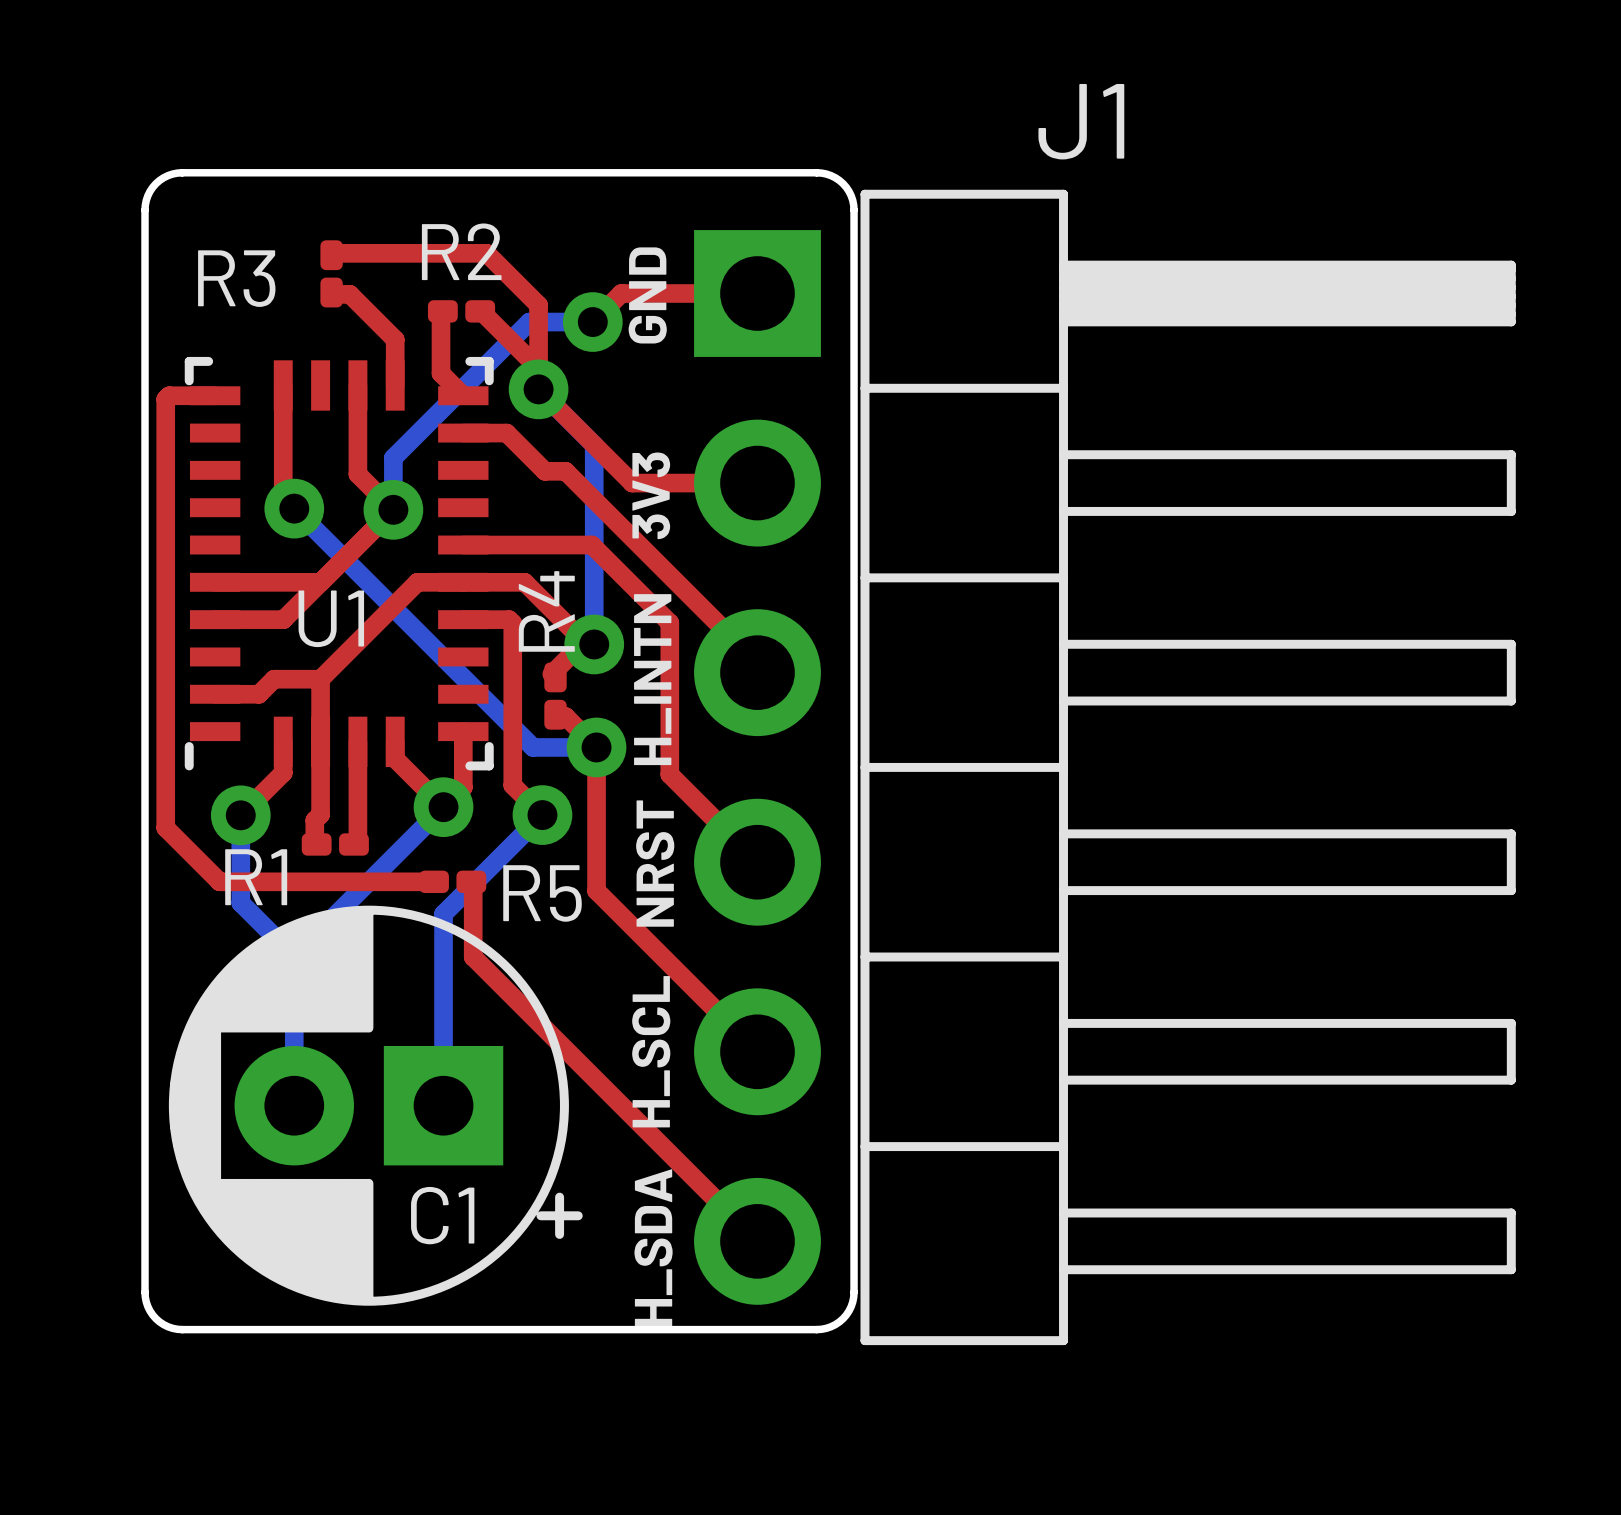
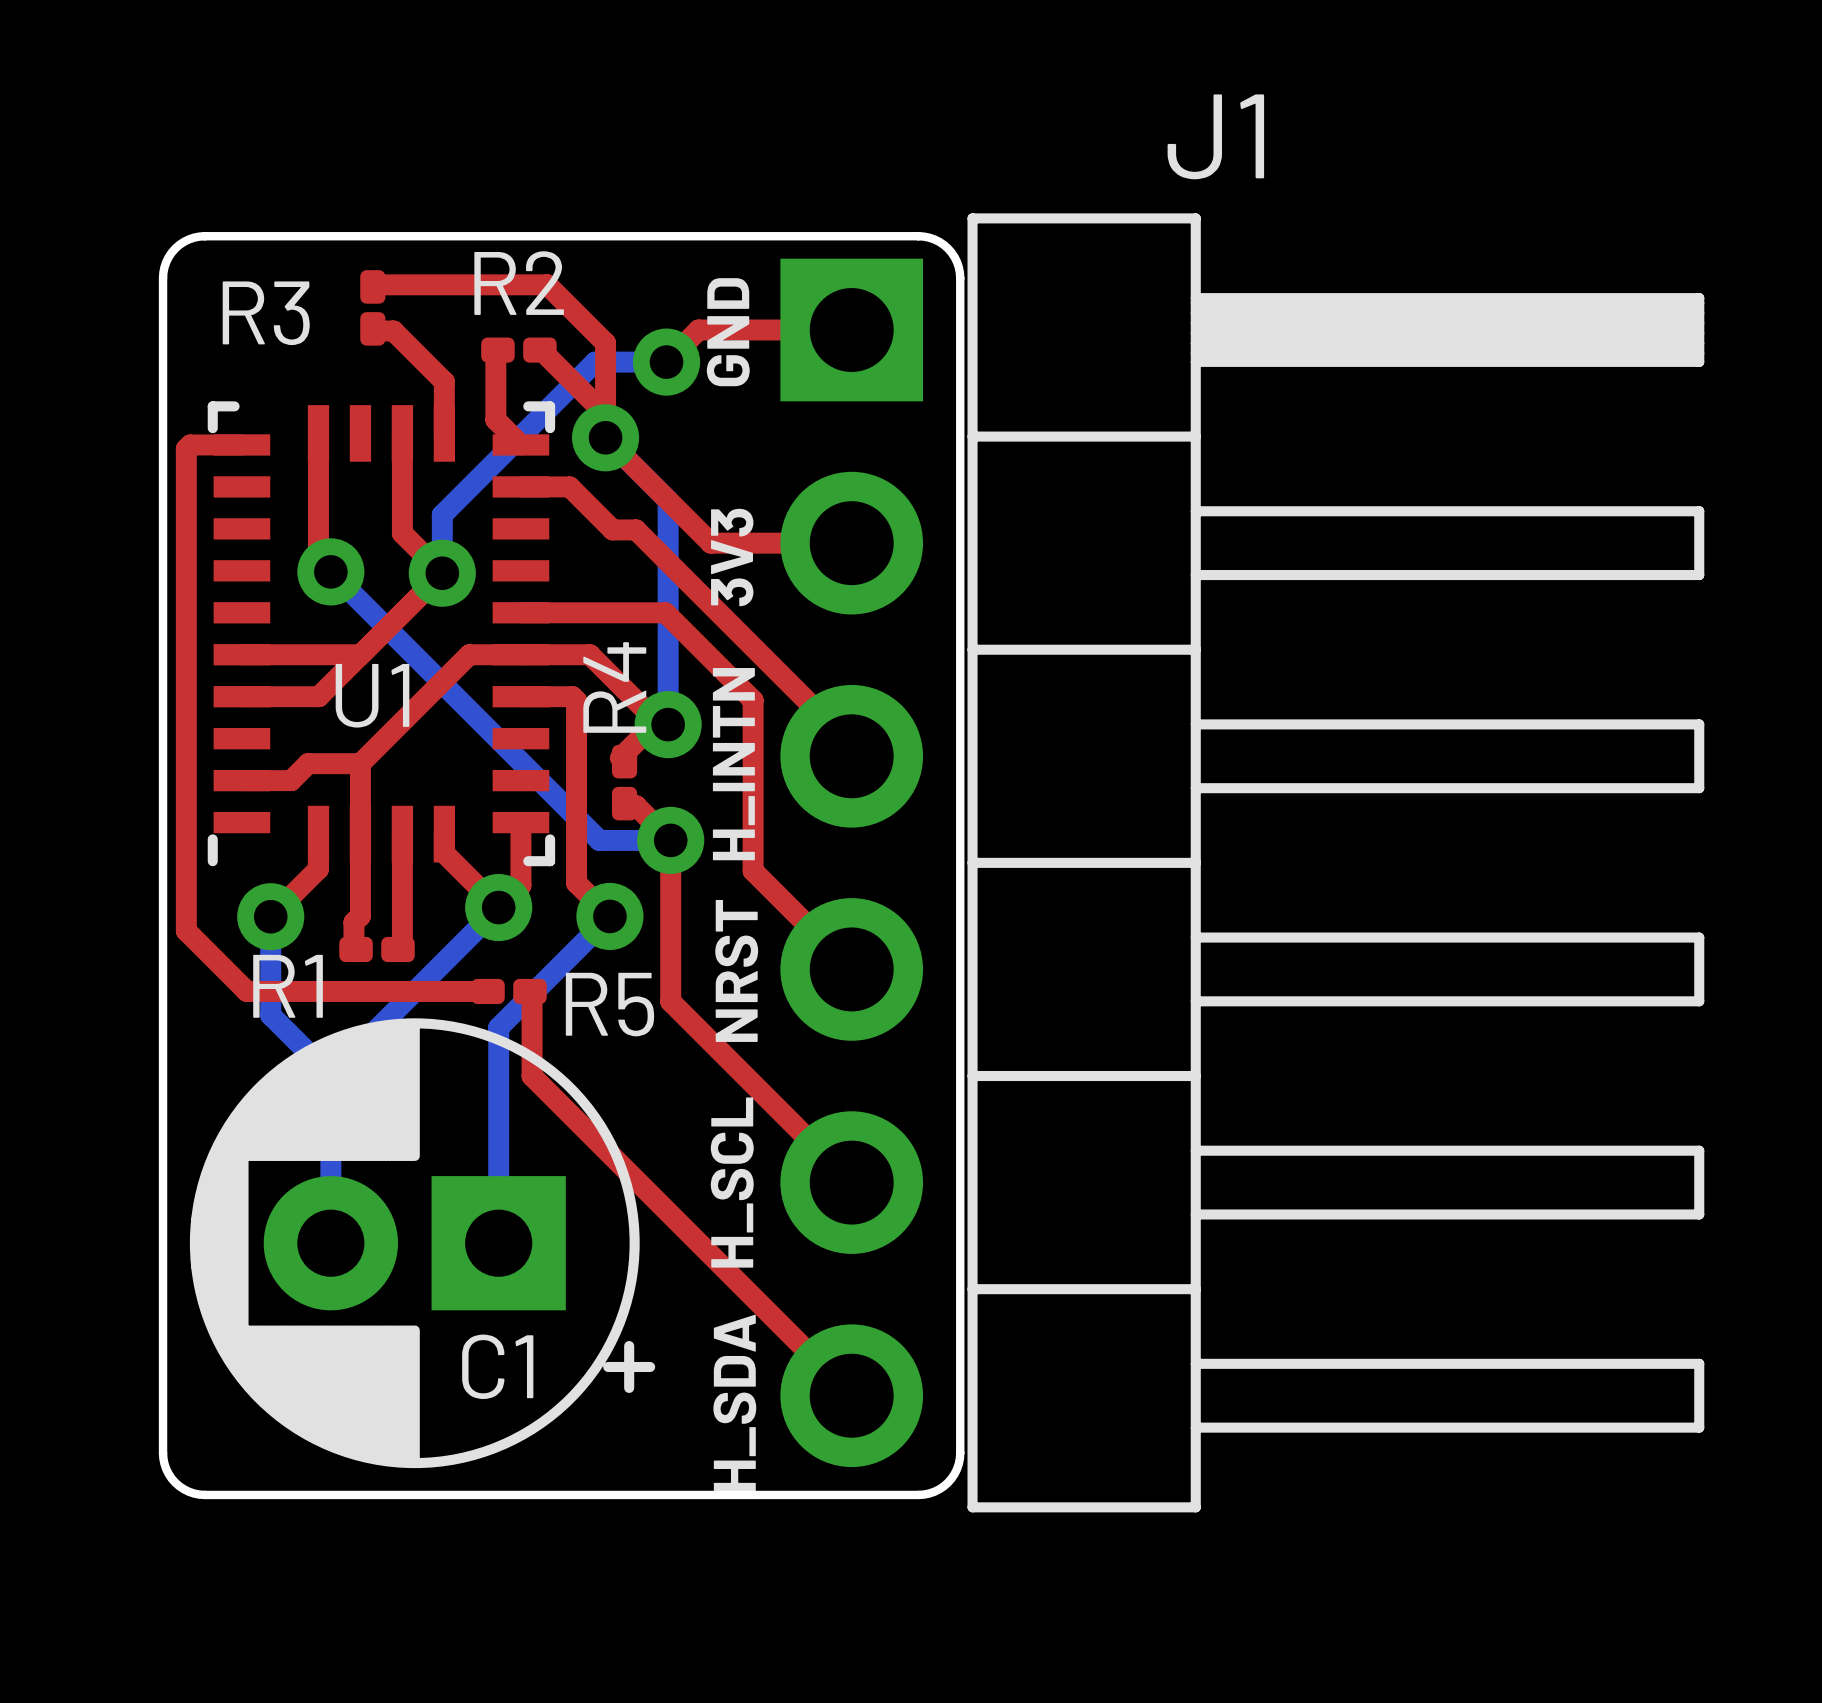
board edge: (145, 247) (145, 205) (150, 191) (163, 177) (182, 172) (821, 173) (839, 180) (851, 195) (854, 210) (854, 247) -> (163, 278) (166, 262) (175, 248) (188, 239) (205, 236) (918, 236) (934, 239) (947, 248) (957, 262) (960, 278)

